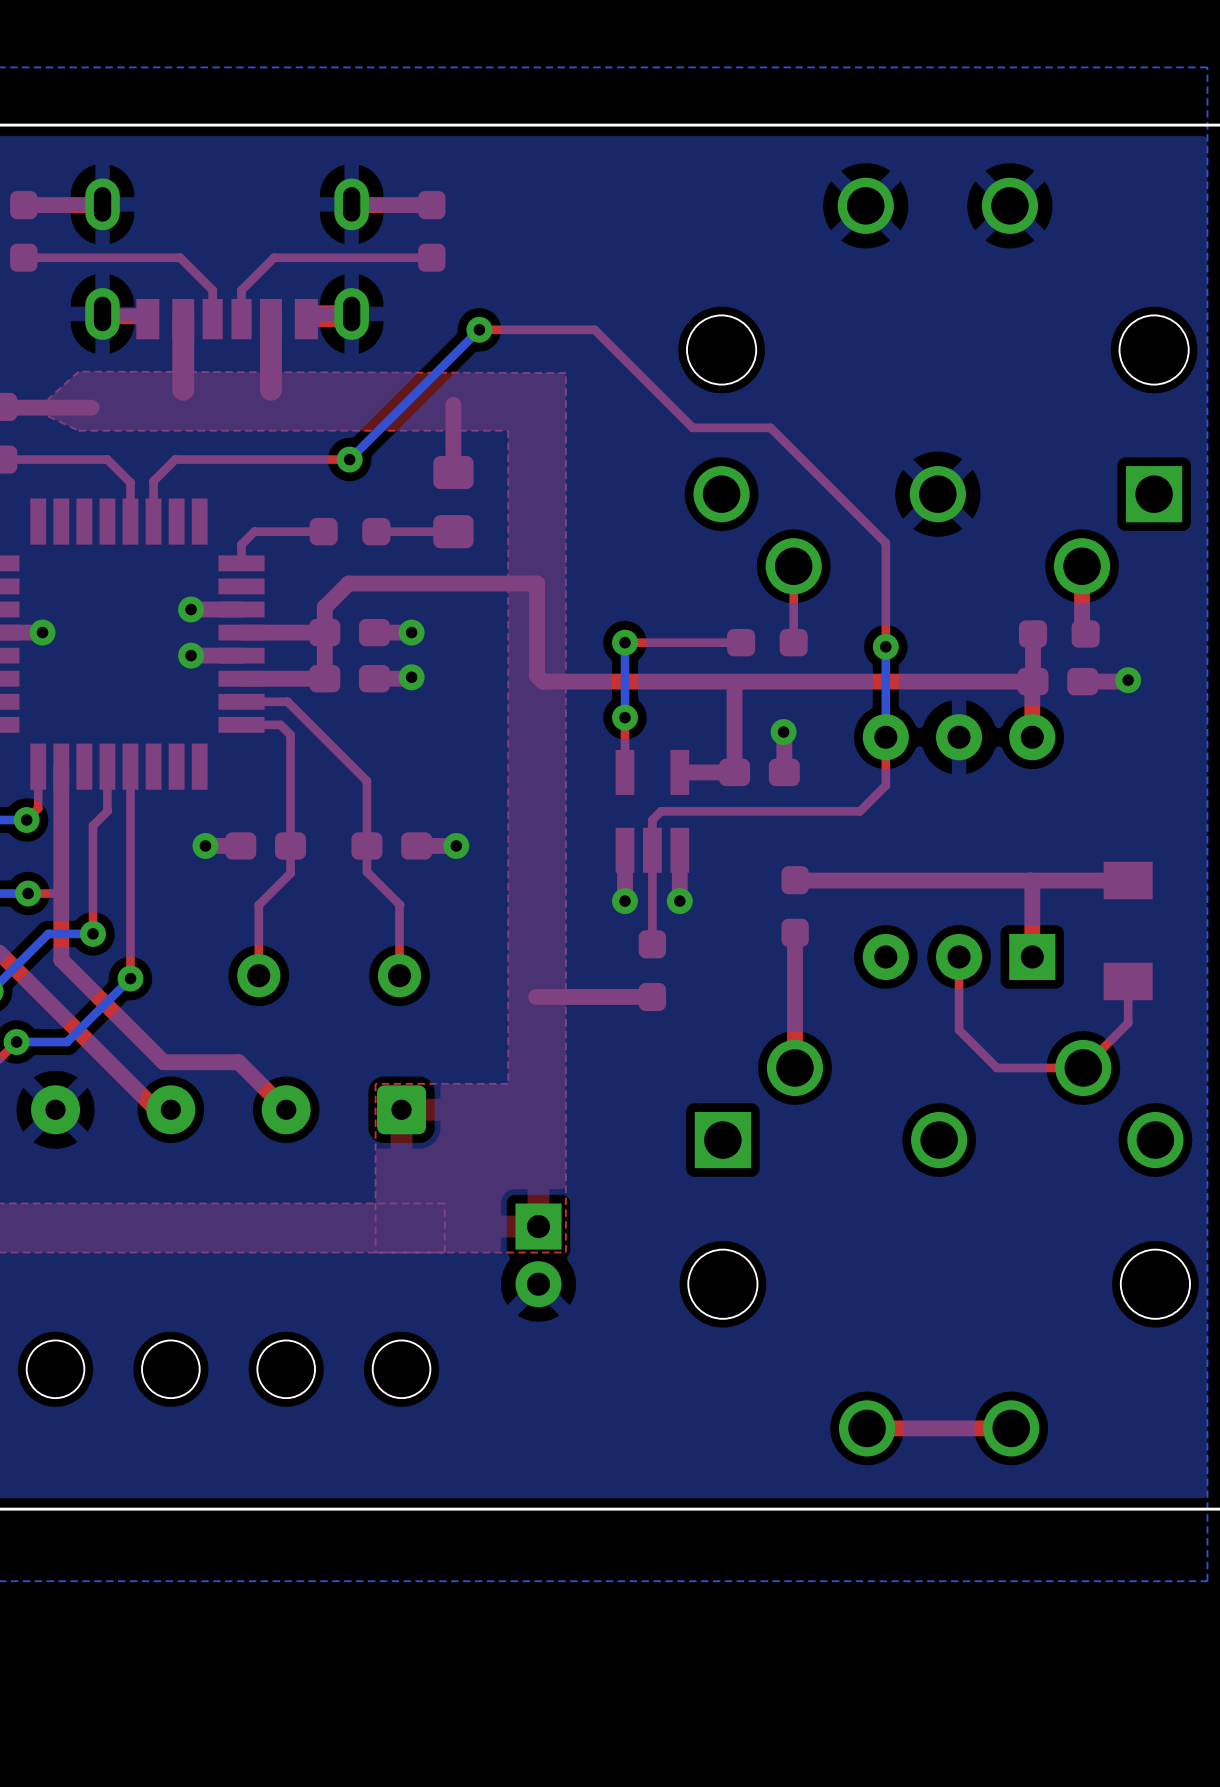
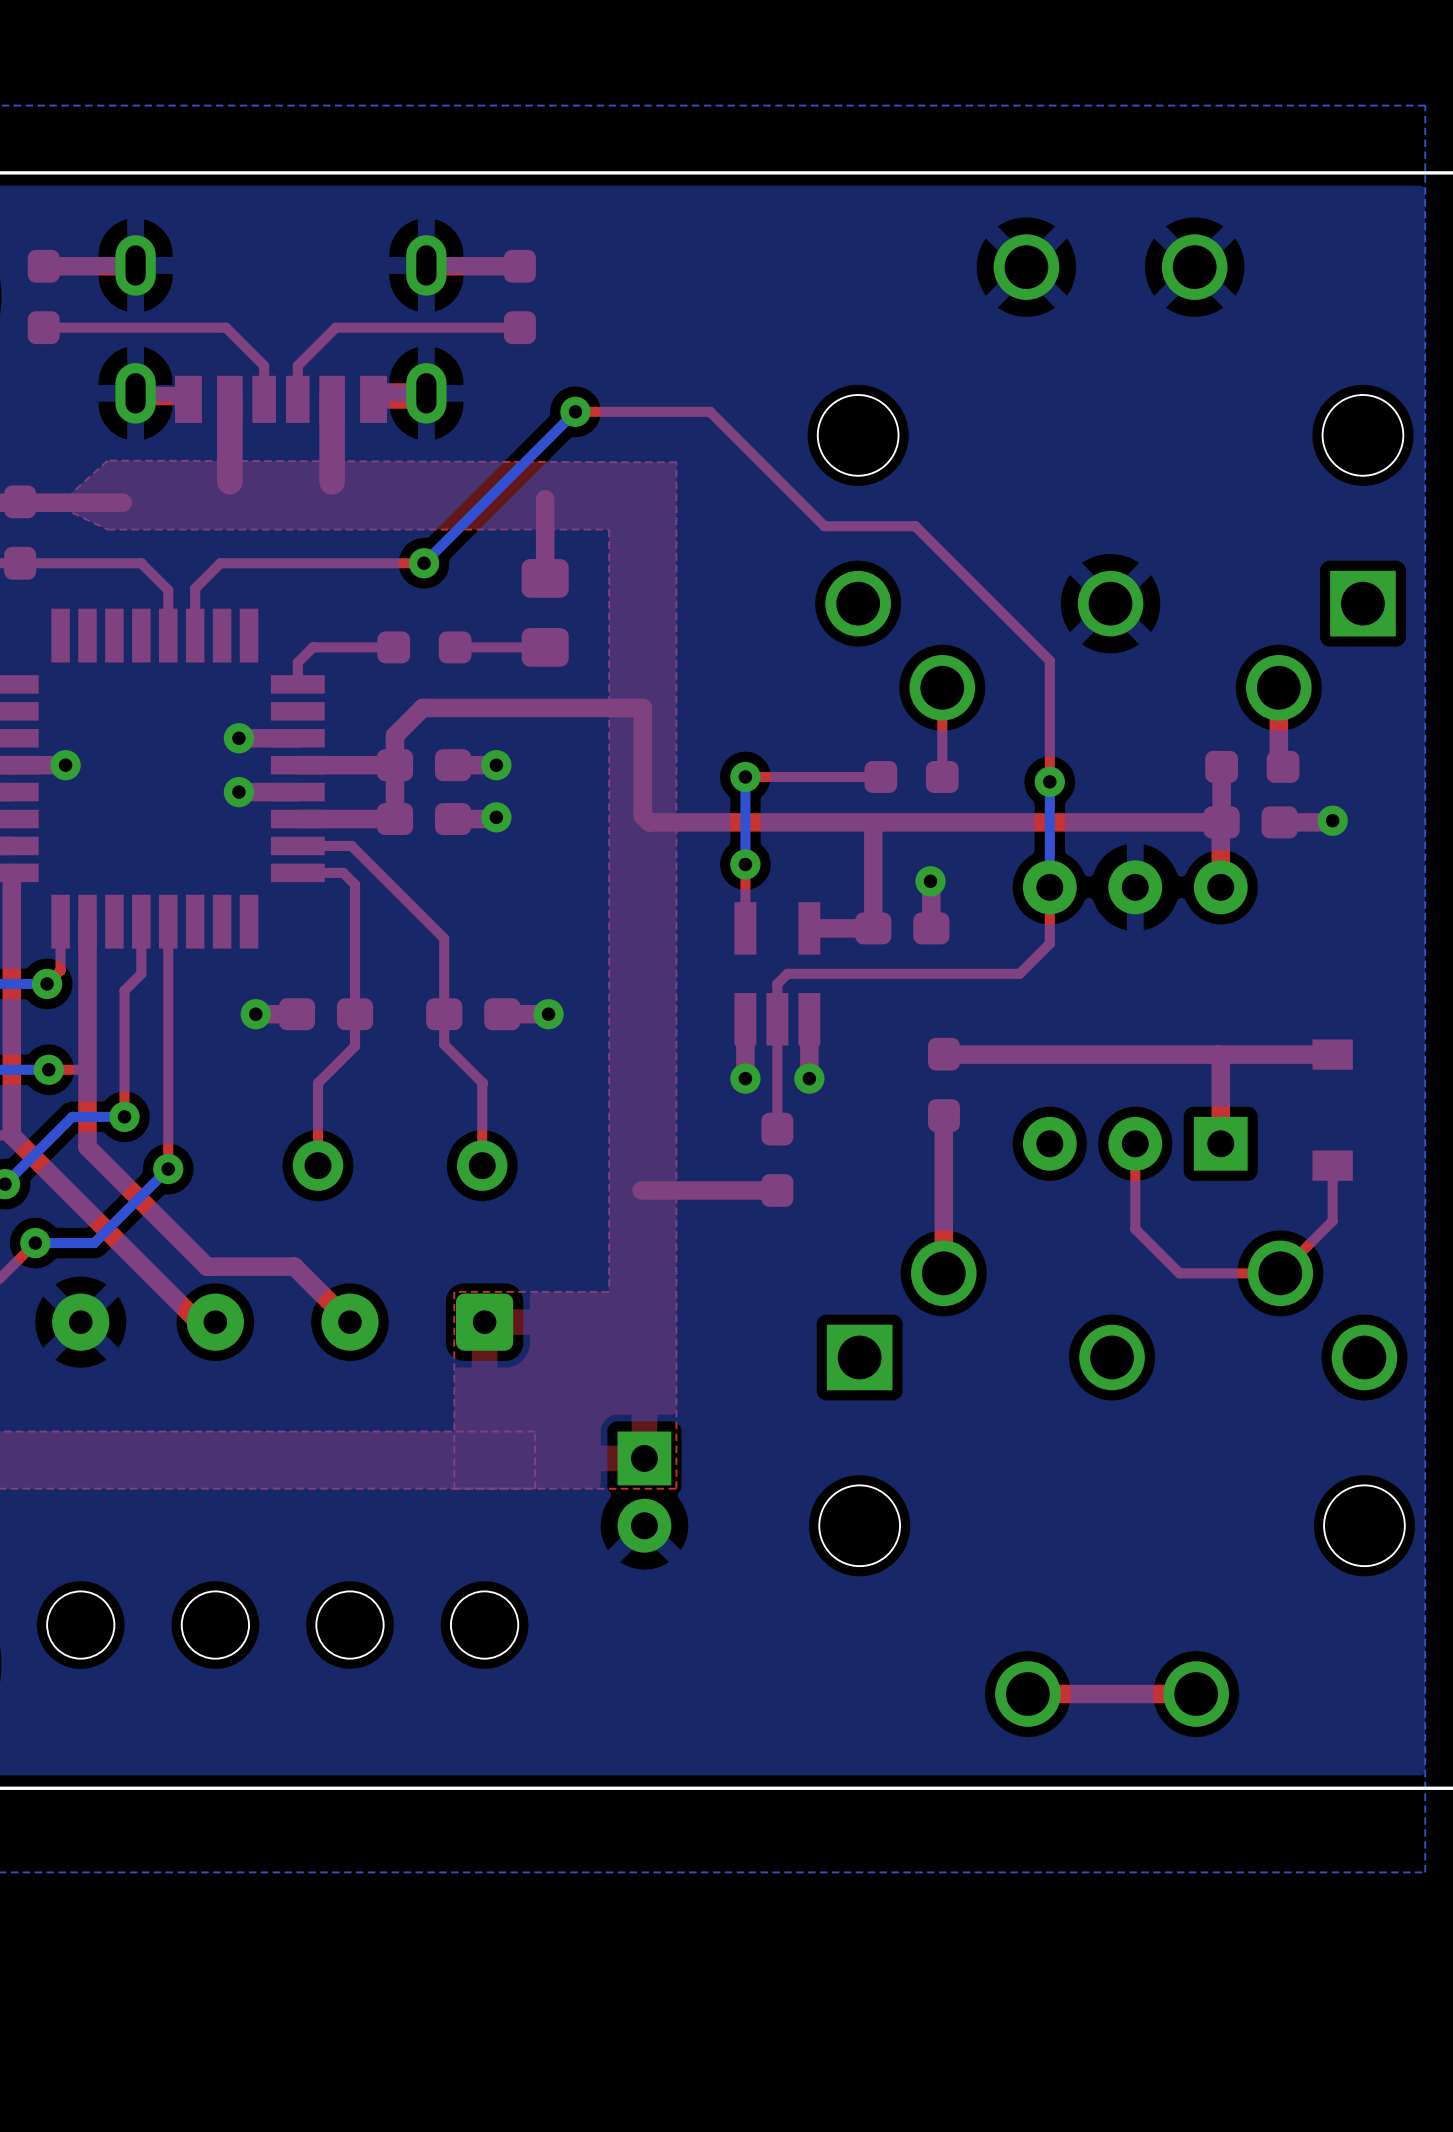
part footprint: [1103, 861, 1153, 1001] -> [1312, 1039, 1353, 1181]

